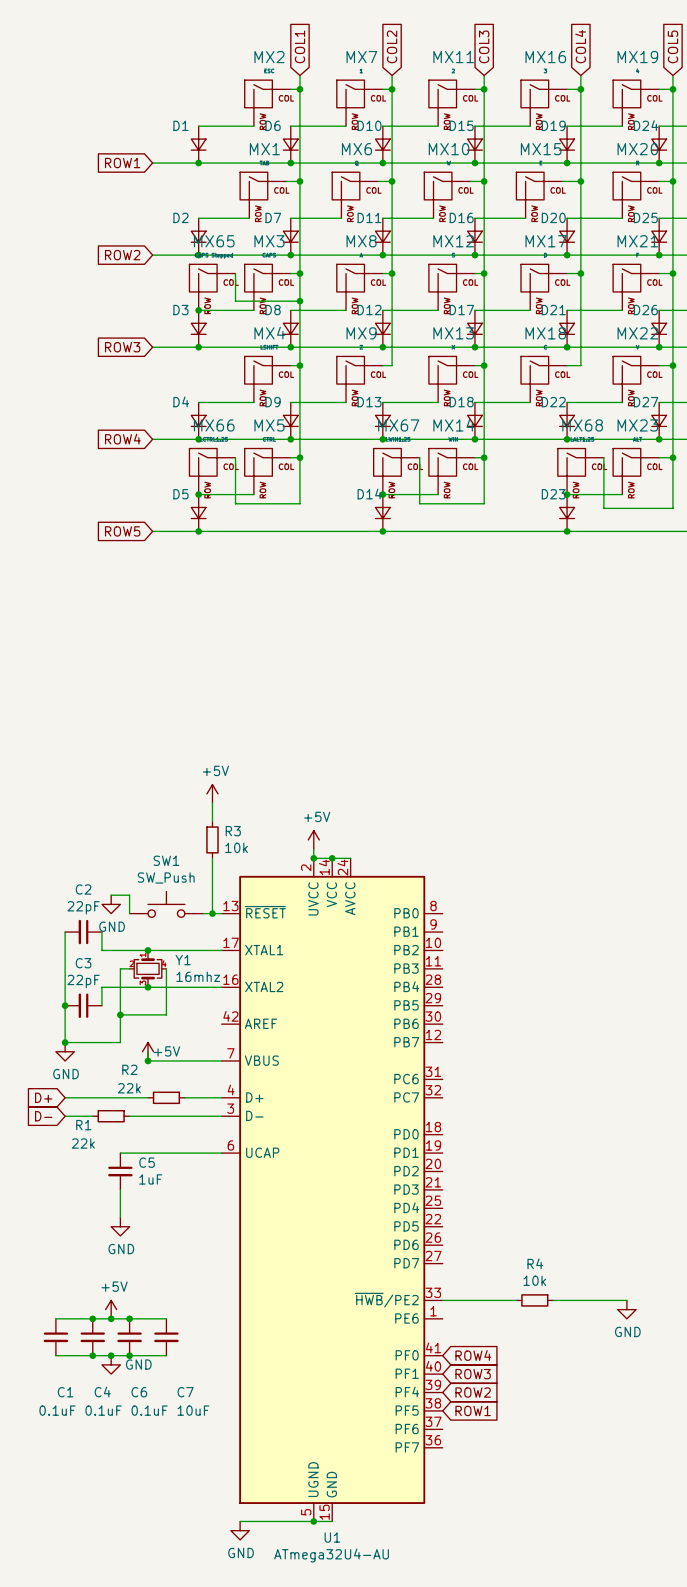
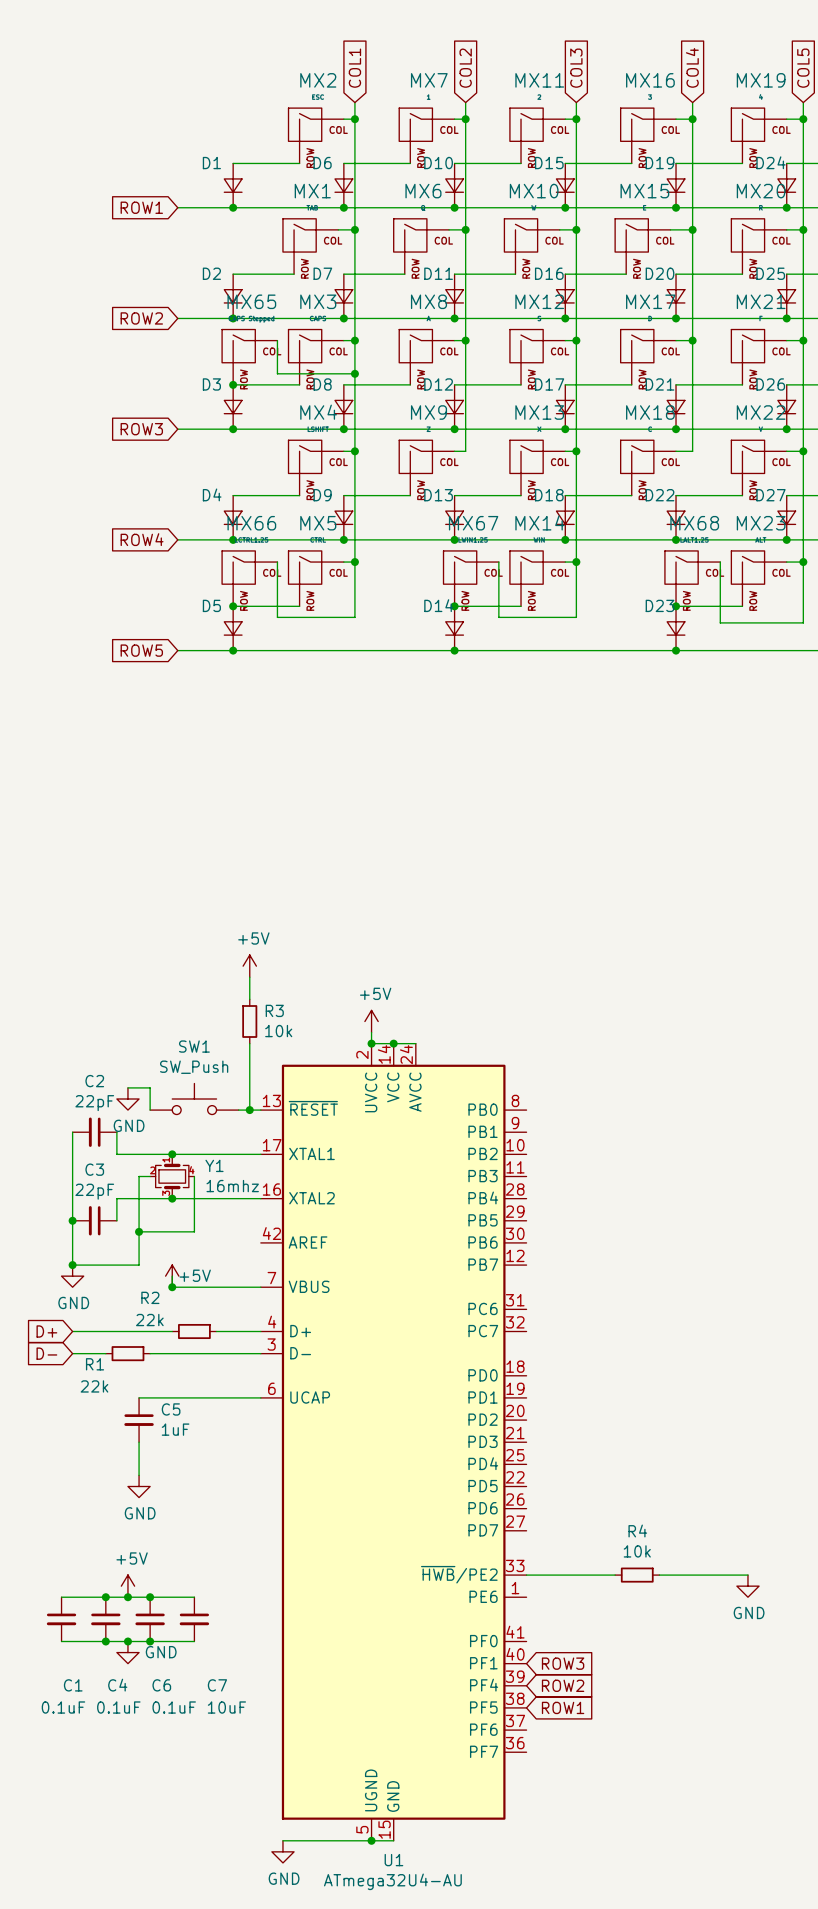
global label: ROW4 (473, 1355) -> none

